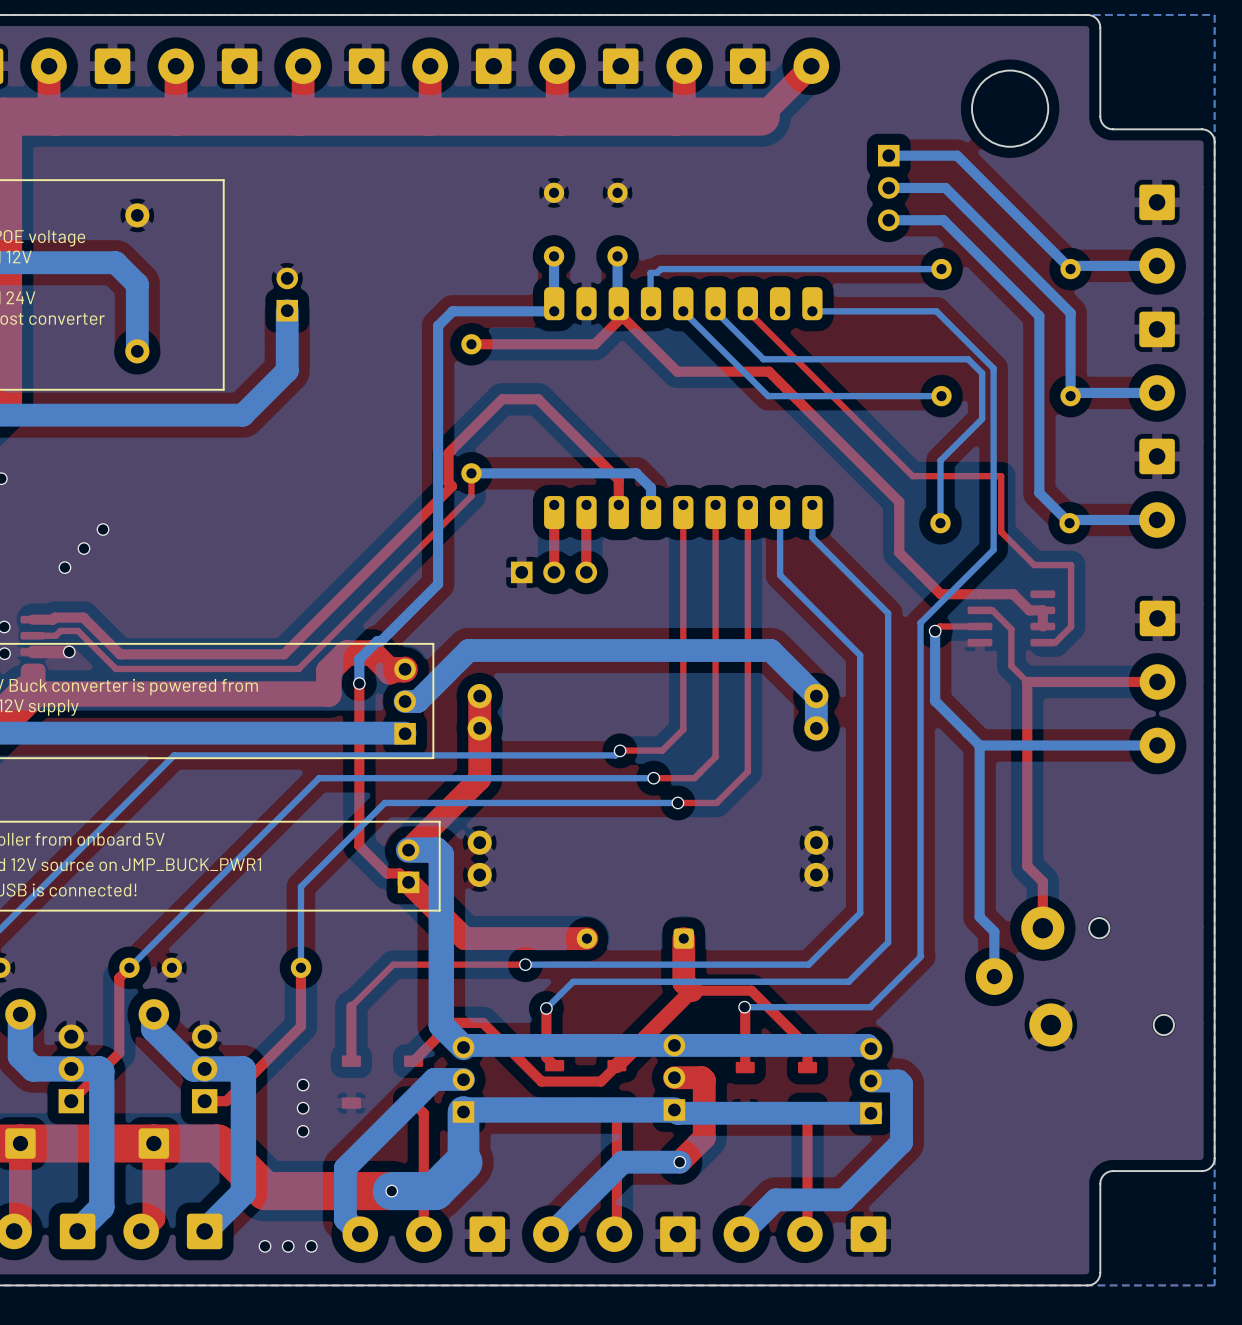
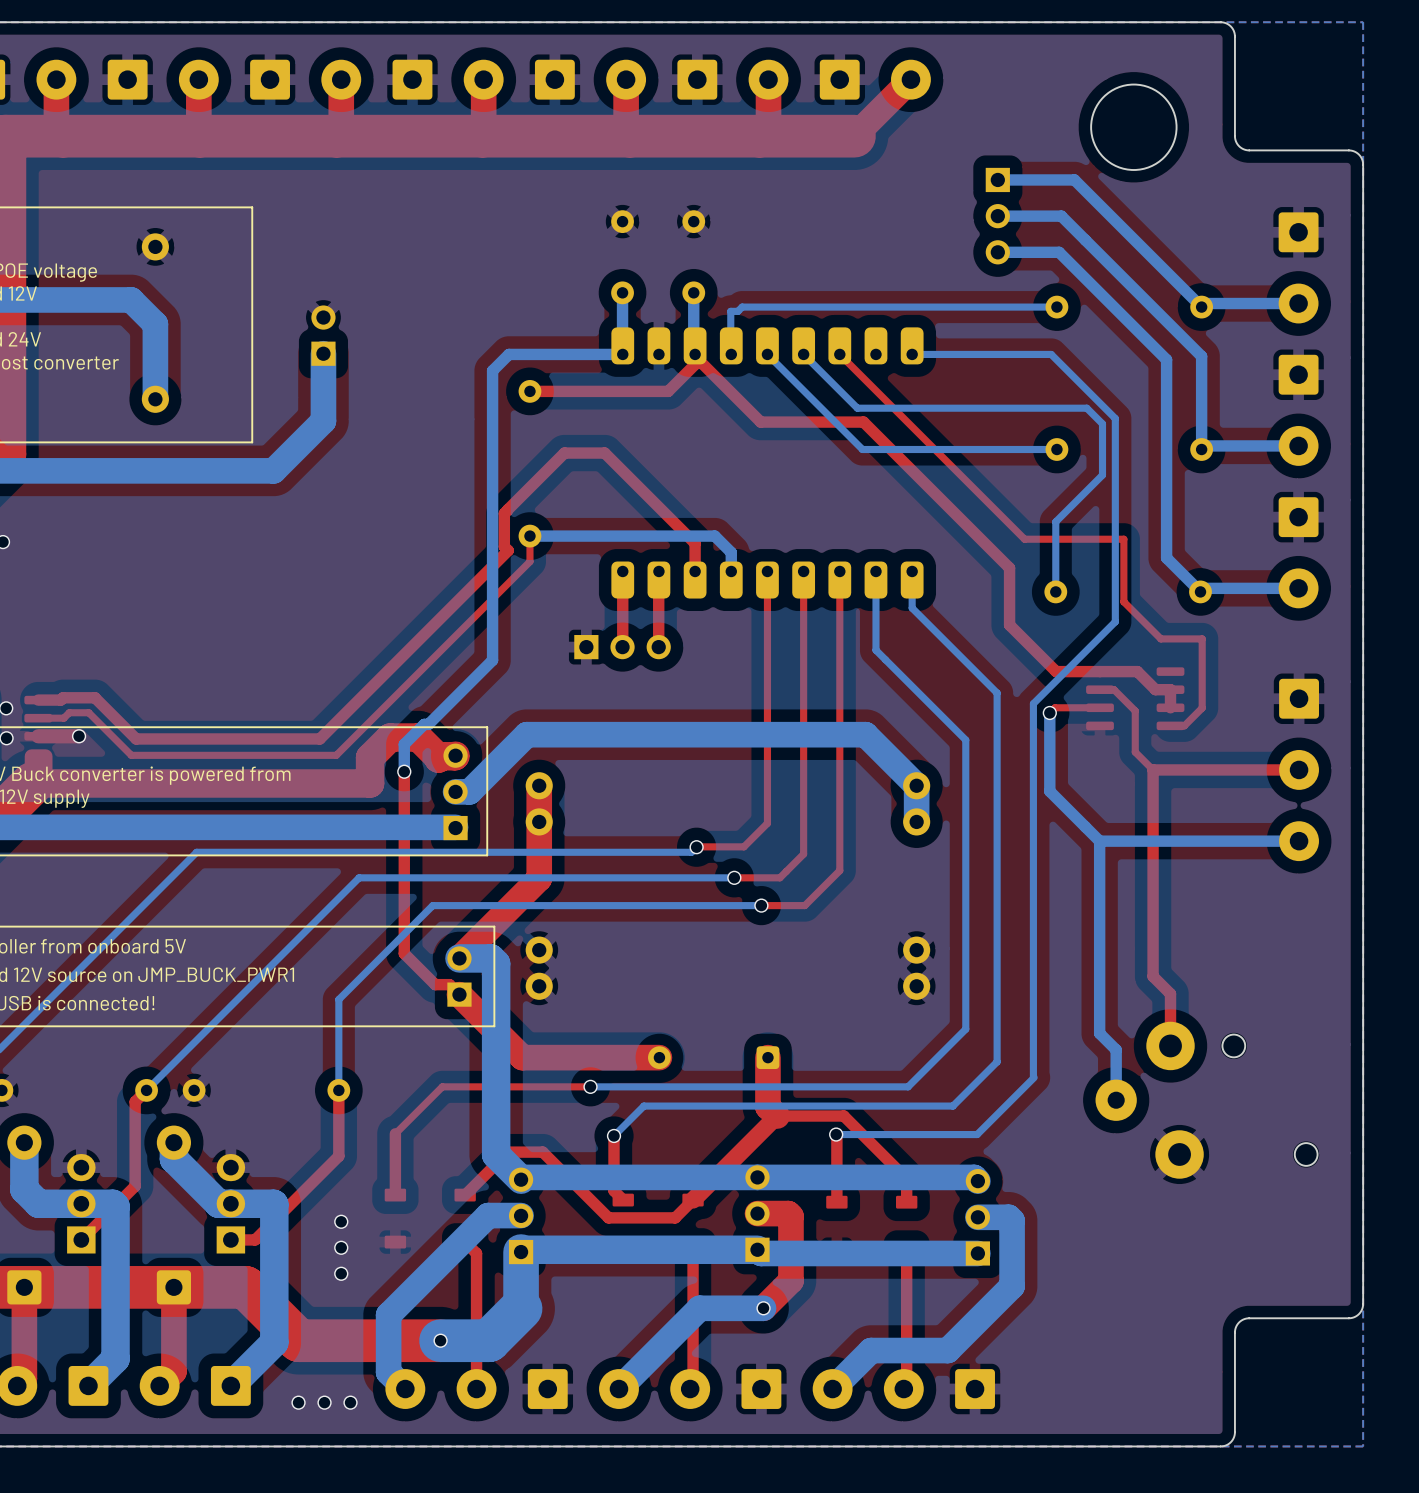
via: (103, 529) -> none
via: (83, 548) -> none
via: (64, 567) -> none

